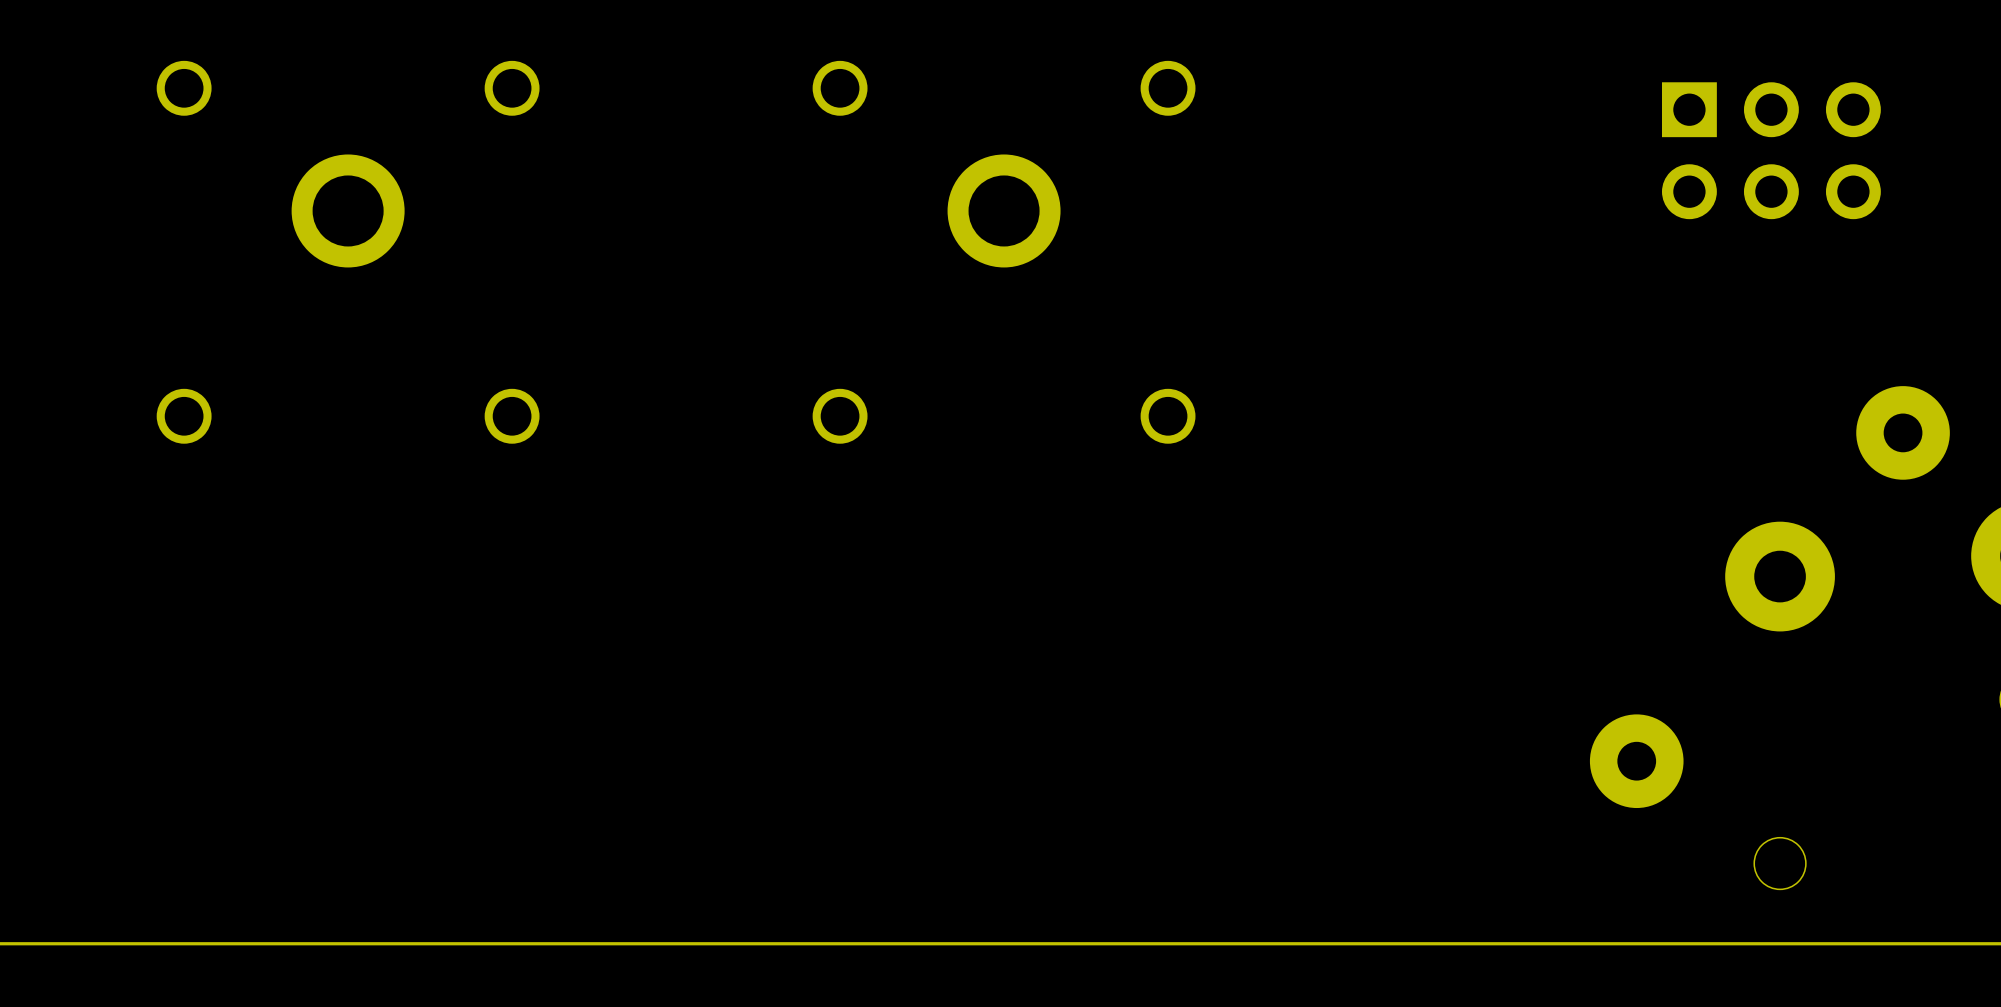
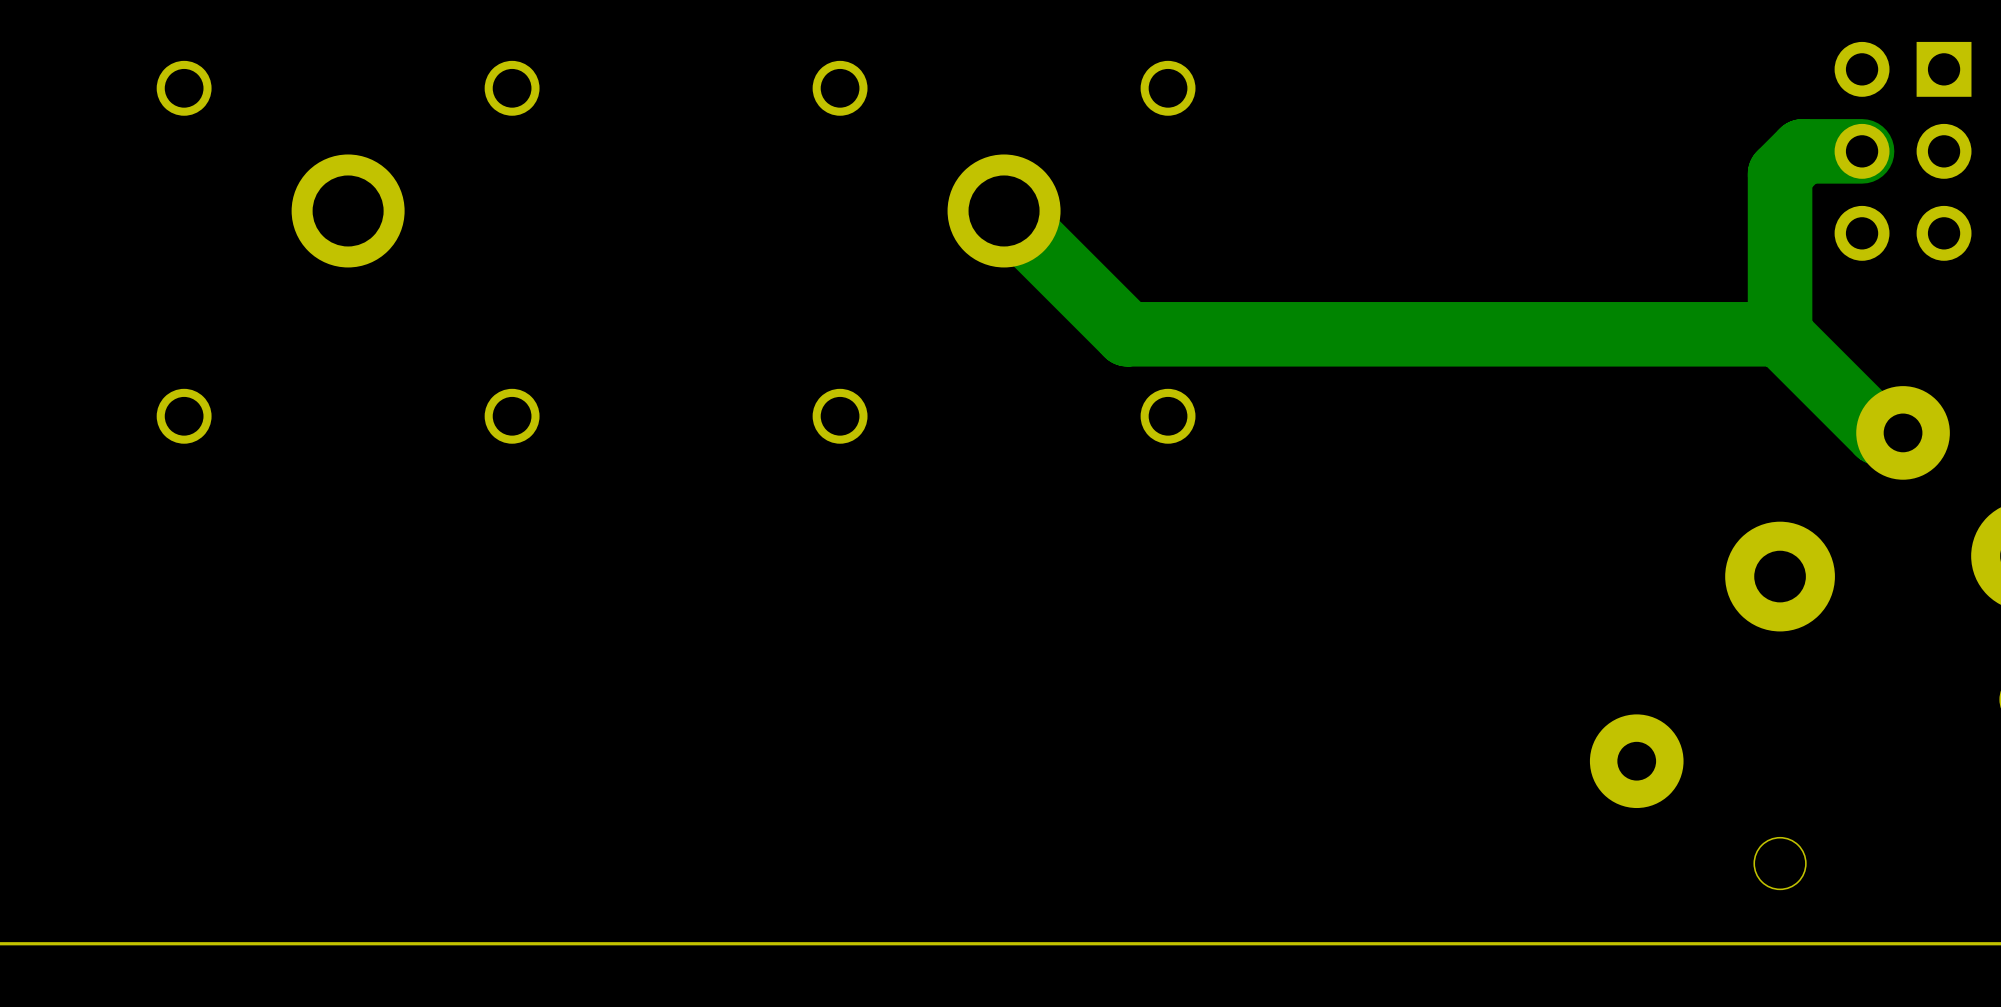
part rotation: 0° (1771, 150) -> 90° clockwise (1903, 151)
part position: (1771, 150) -> (1903, 151)
track: none -> (1862, 151) (1802, 151) (1780, 173) (1780, 334)
track: none -> (1004, 210) (1127, 334) (1780, 334)
track: none -> (1780, 334) (1878, 432) (1903, 432)

